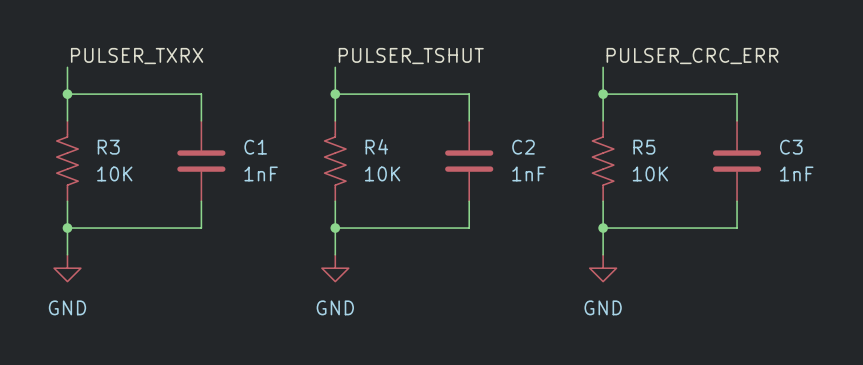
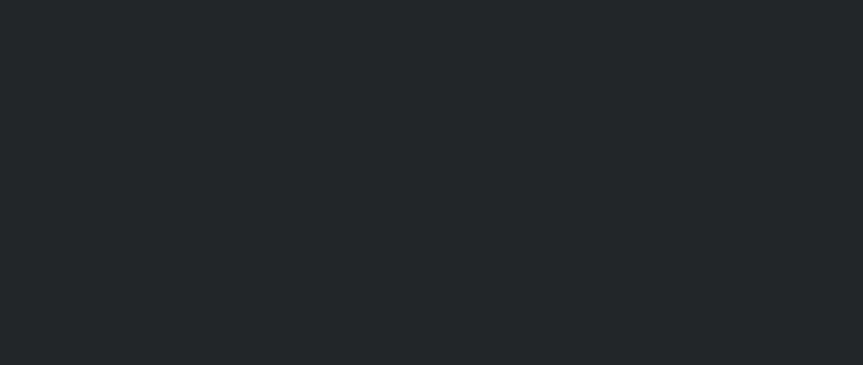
label: PULSER_TXRX (137, 56) -> none
label: PULSER_TSHUT (411, 56) -> none
label: PULSER_CRC_ERR (692, 56) -> none
wire: (67, 67) (67, 120) -> none
wire: (335, 67) (335, 120) -> none
wire: (603, 67) (603, 120) -> none
wire: (67, 94) (201, 94) (201, 120) -> none
junction: (67, 94) -> none
wire: (335, 94) (469, 94) (469, 120) -> none
junction: (335, 94) -> none
wire: (603, 94) (737, 94) (737, 120) -> none
junction: (603, 94) -> none
R3: 10K (67, 161) -> none
C1: 1nF (201, 161) -> none
R4: 10K (335, 161) -> none
C2: 1nF (469, 161) -> none
R5: 10K (603, 161) -> none
C3: 1nF (737, 161) -> none
wire: (67, 201) (67, 254) -> none
wire: (201, 201) (201, 228) (67, 228) -> none
wire: (335, 201) (335, 254) -> none
wire: (469, 201) (469, 228) (335, 228) -> none
wire: (603, 201) (603, 254) -> none
wire: (737, 201) (737, 228) (603, 228) -> none
junction: (67, 228) -> none
junction: (335, 228) -> none
junction: (603, 228) -> none
power symbol: GND (67, 268) -> none
power symbol: GND (335, 268) -> none
power symbol: GND (603, 268) -> none

